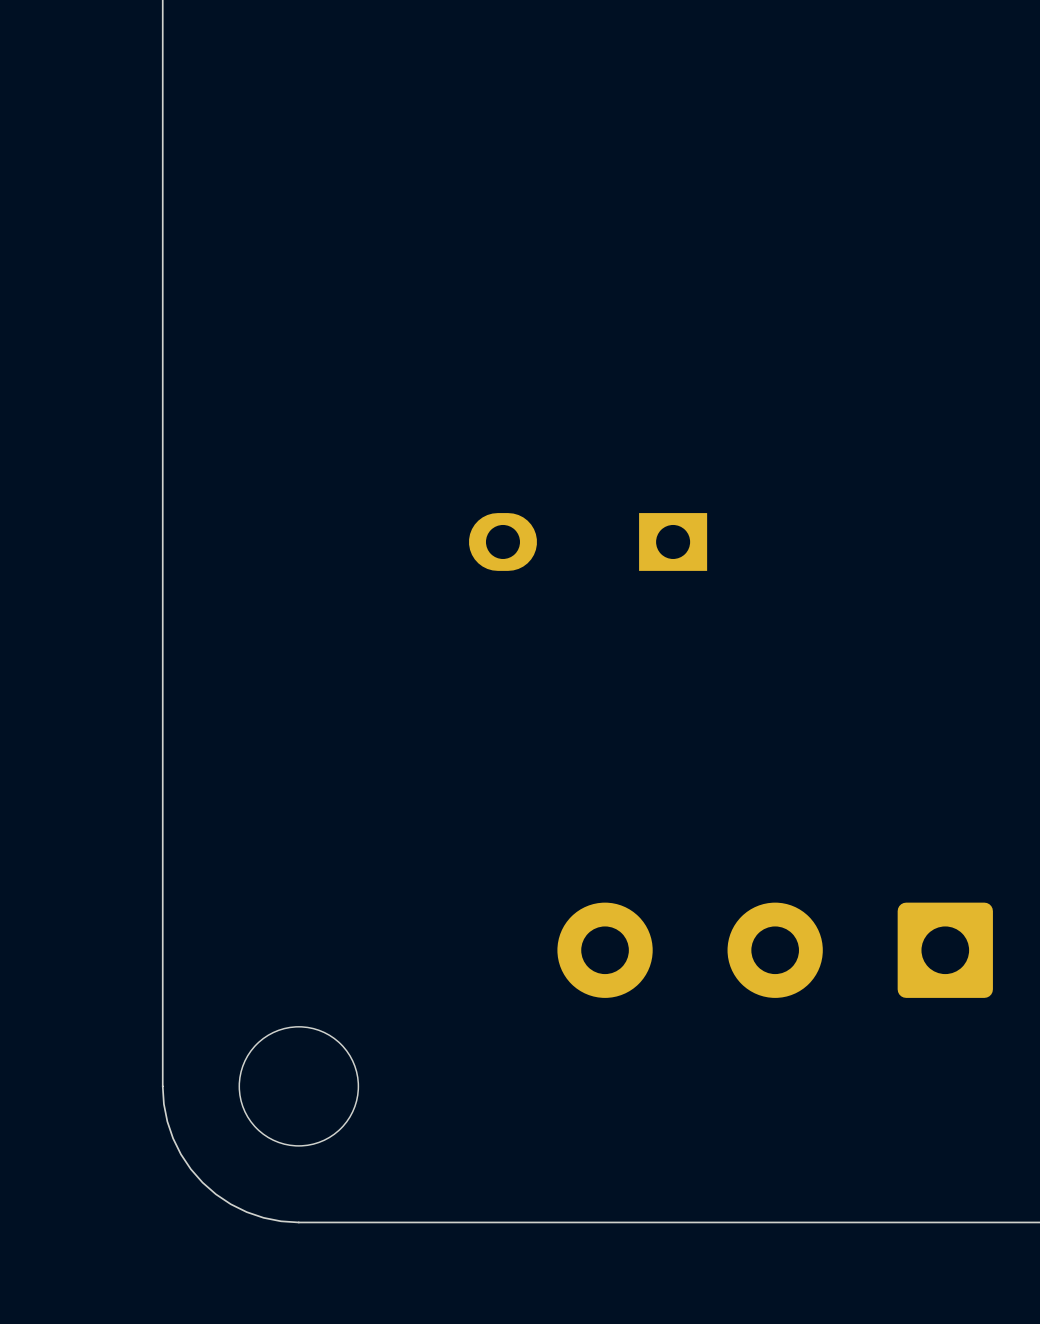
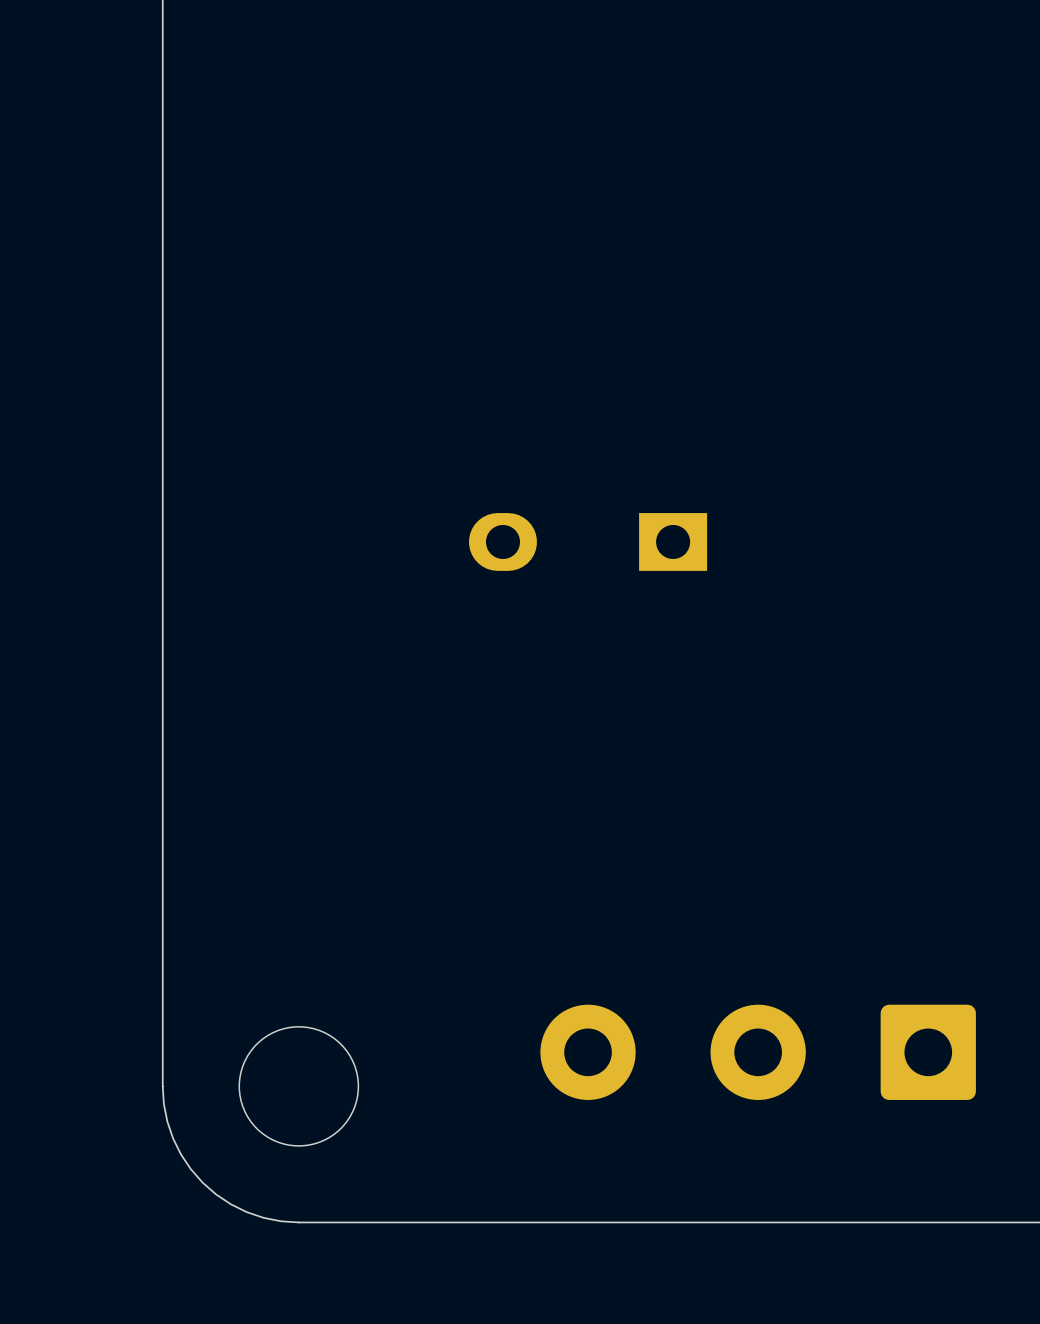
part position: (775, 950) -> (758, 1052)

